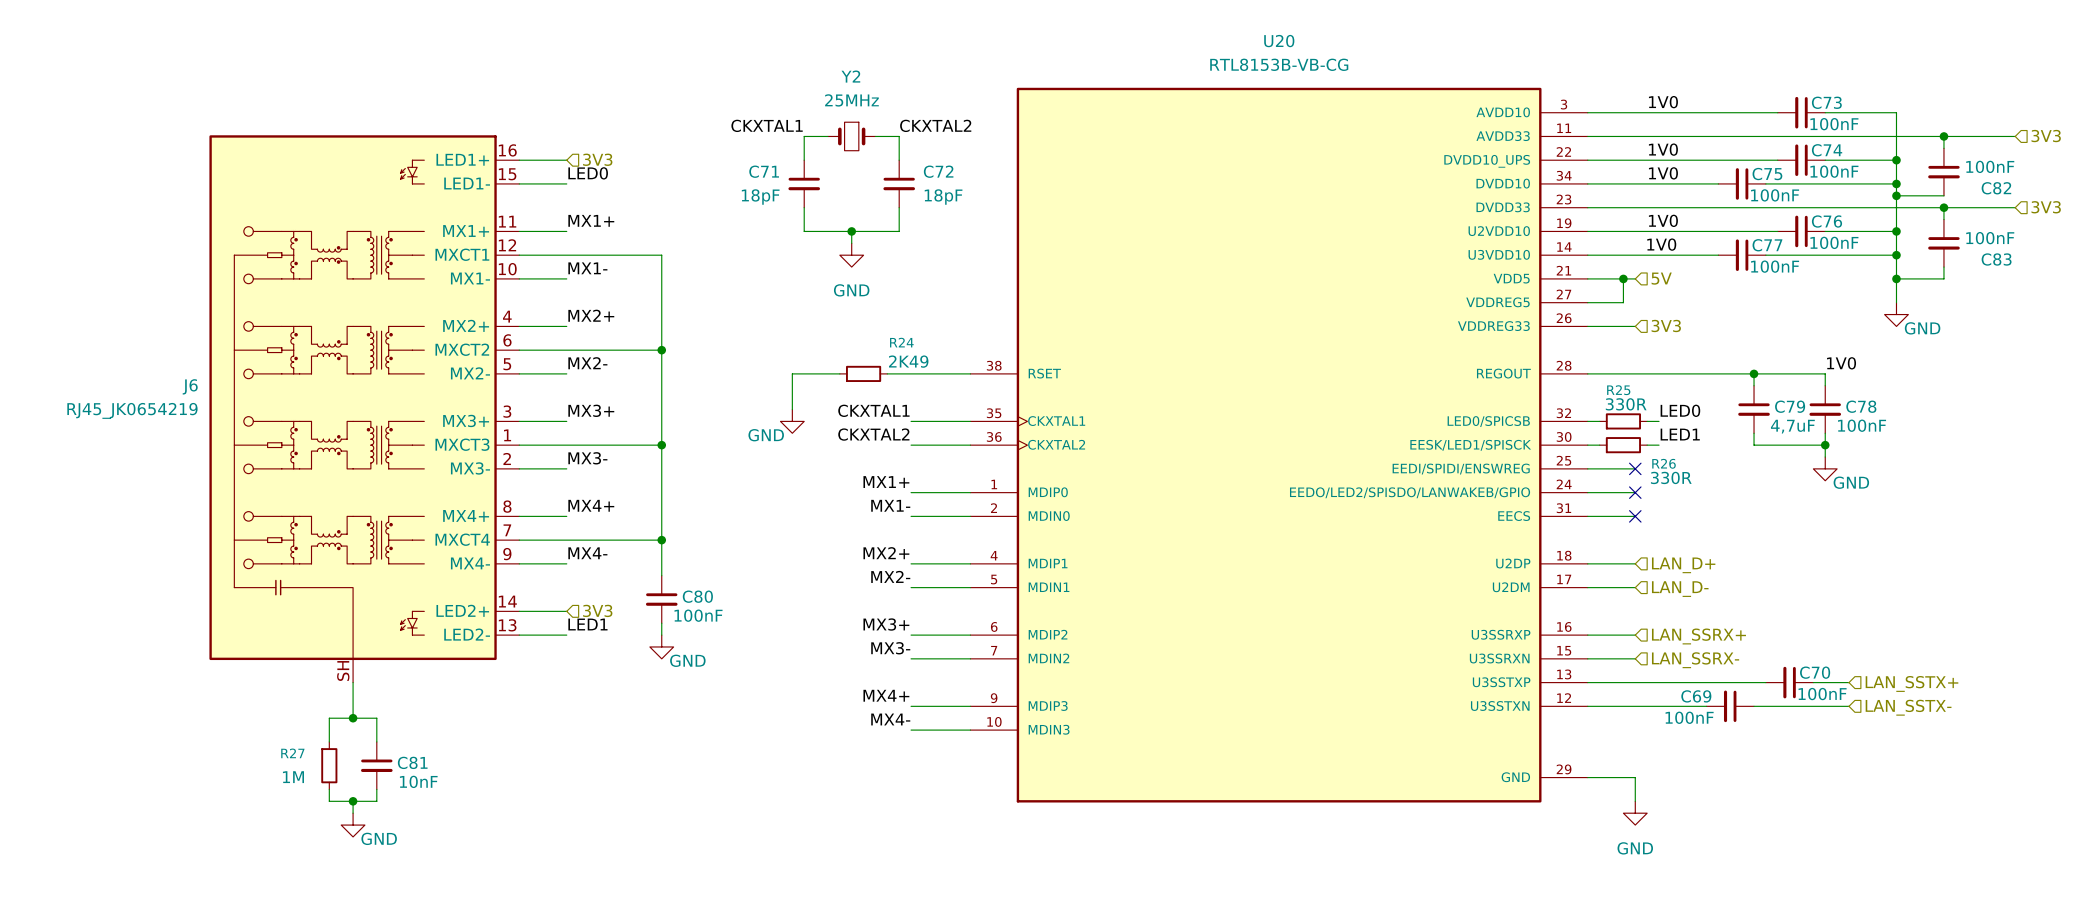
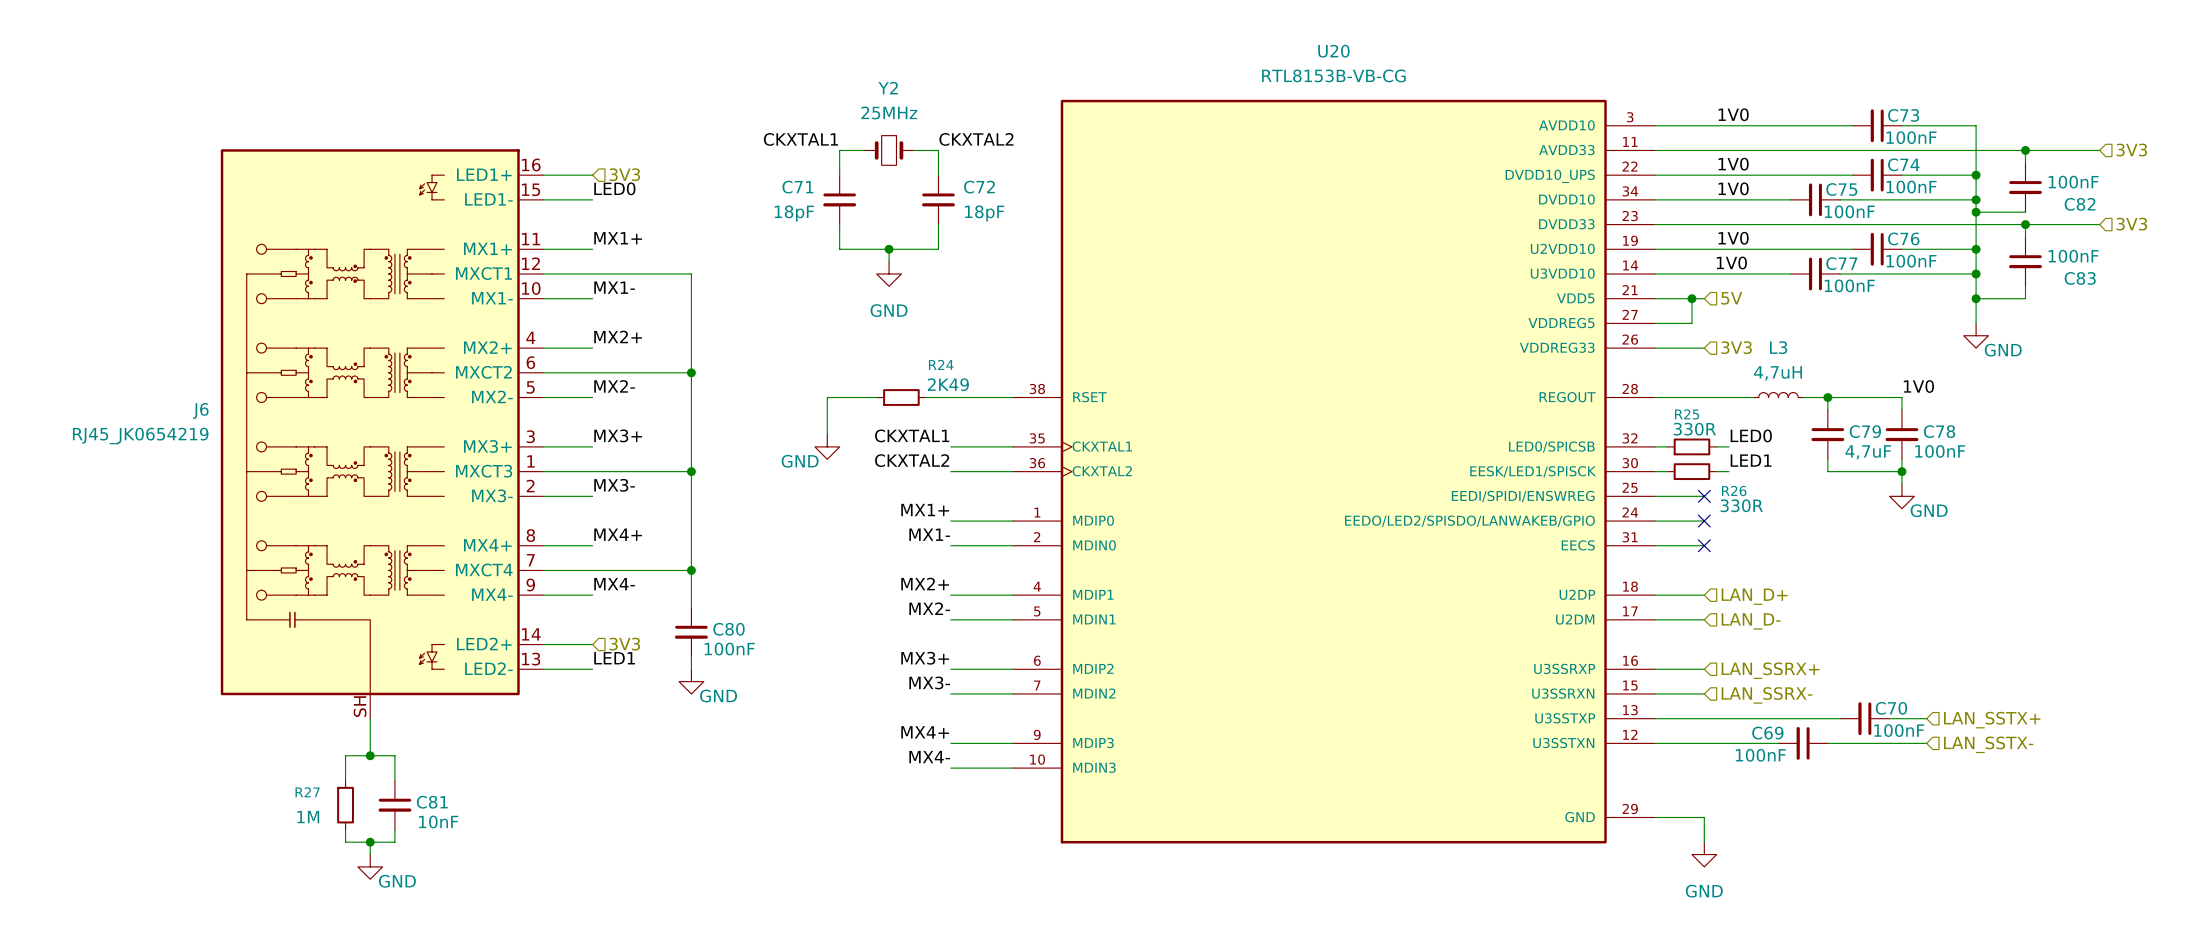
L3: none -> 4,7uH (1778, 395)
wire: (1682, 373) (1730, 373) -> none

